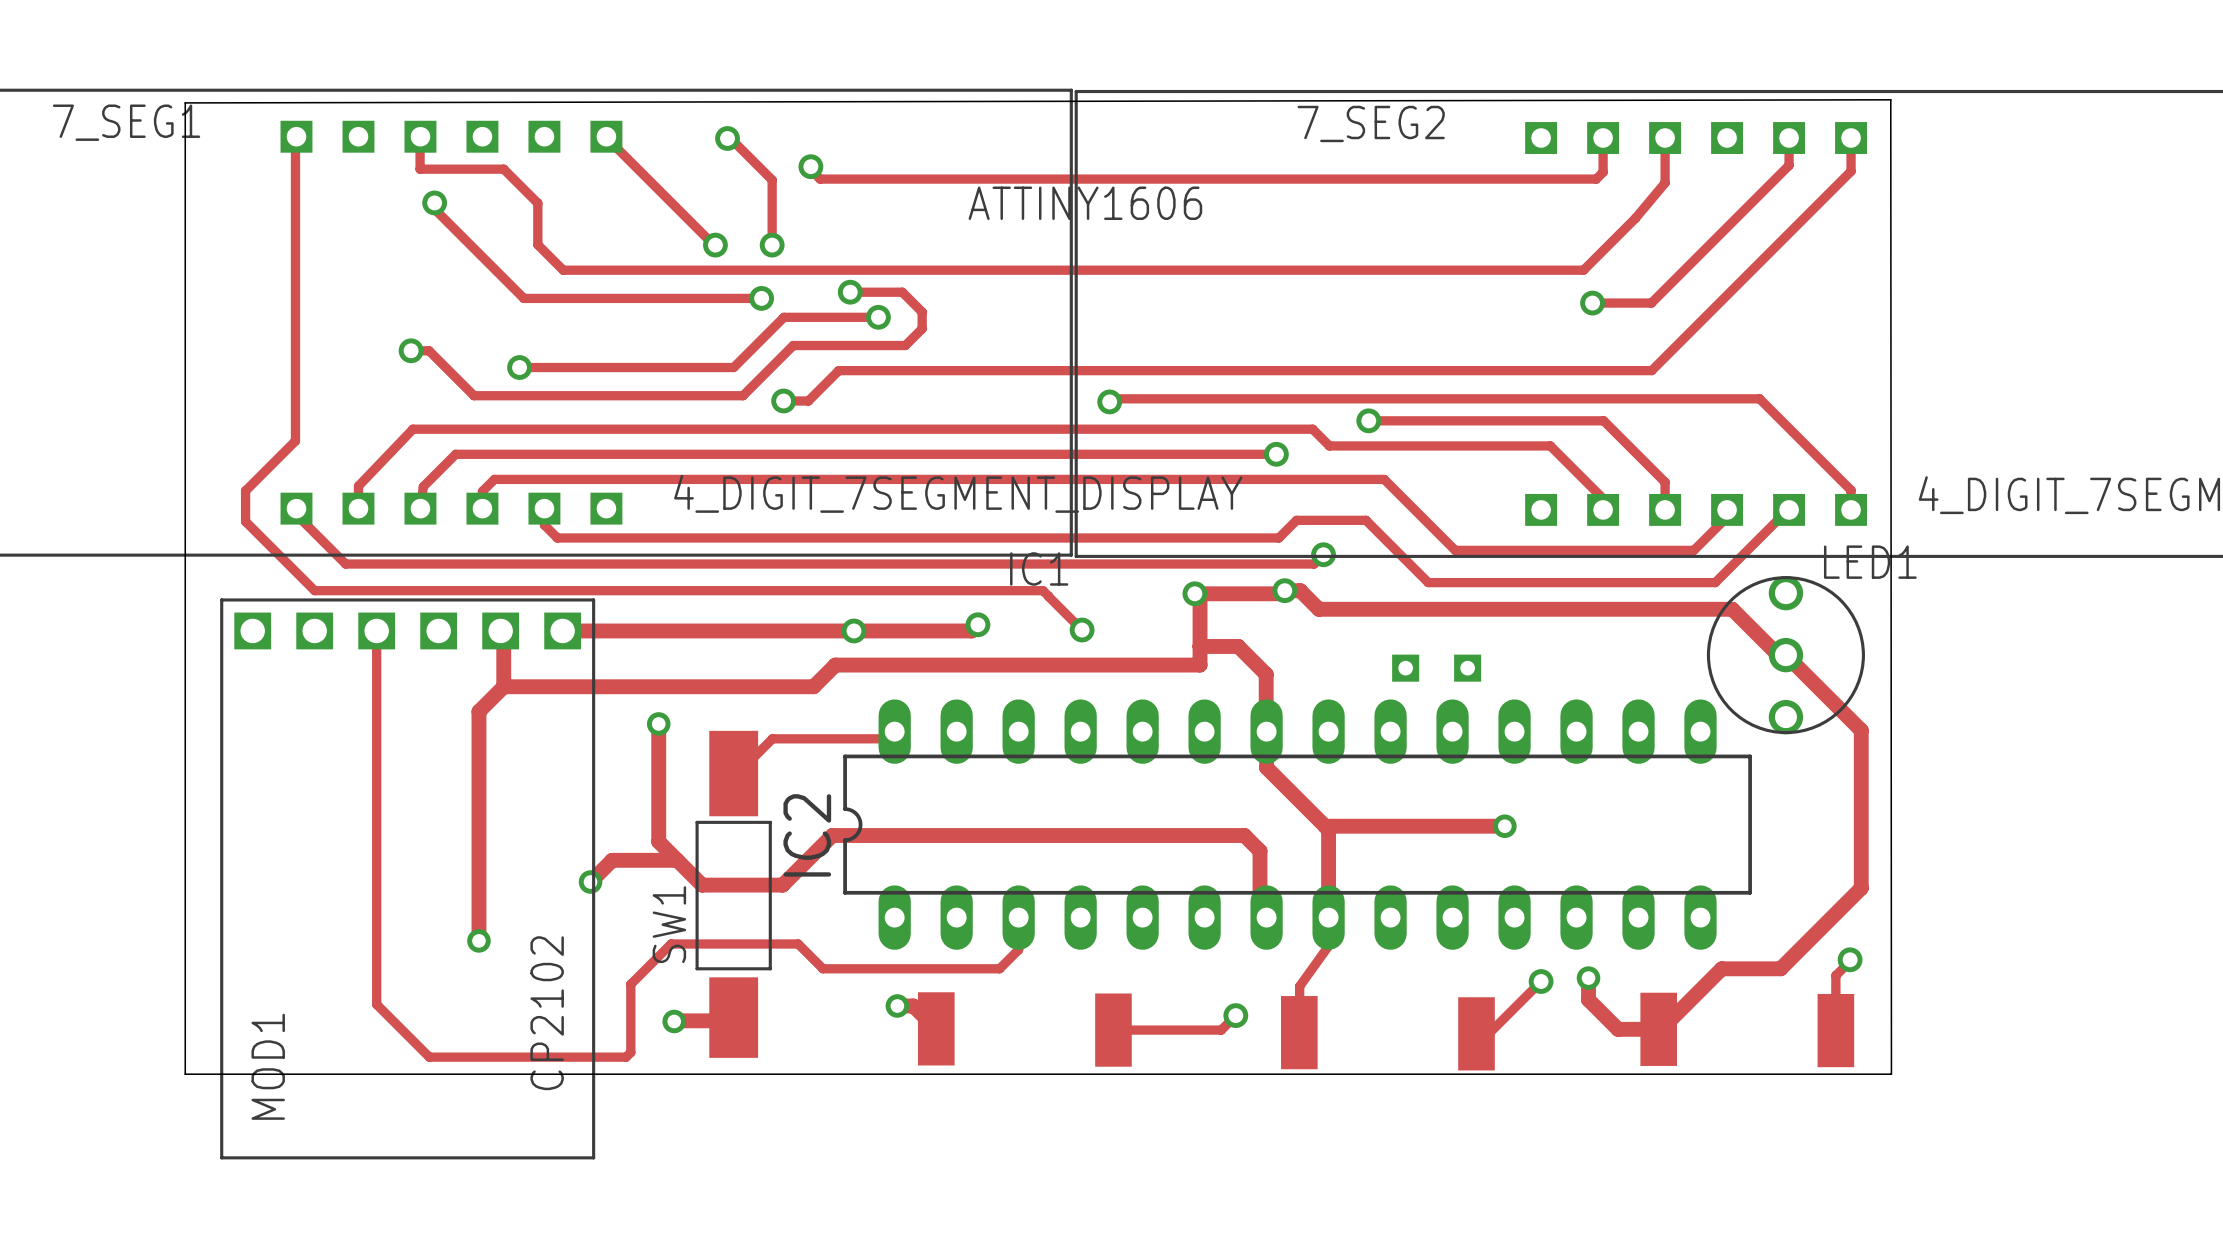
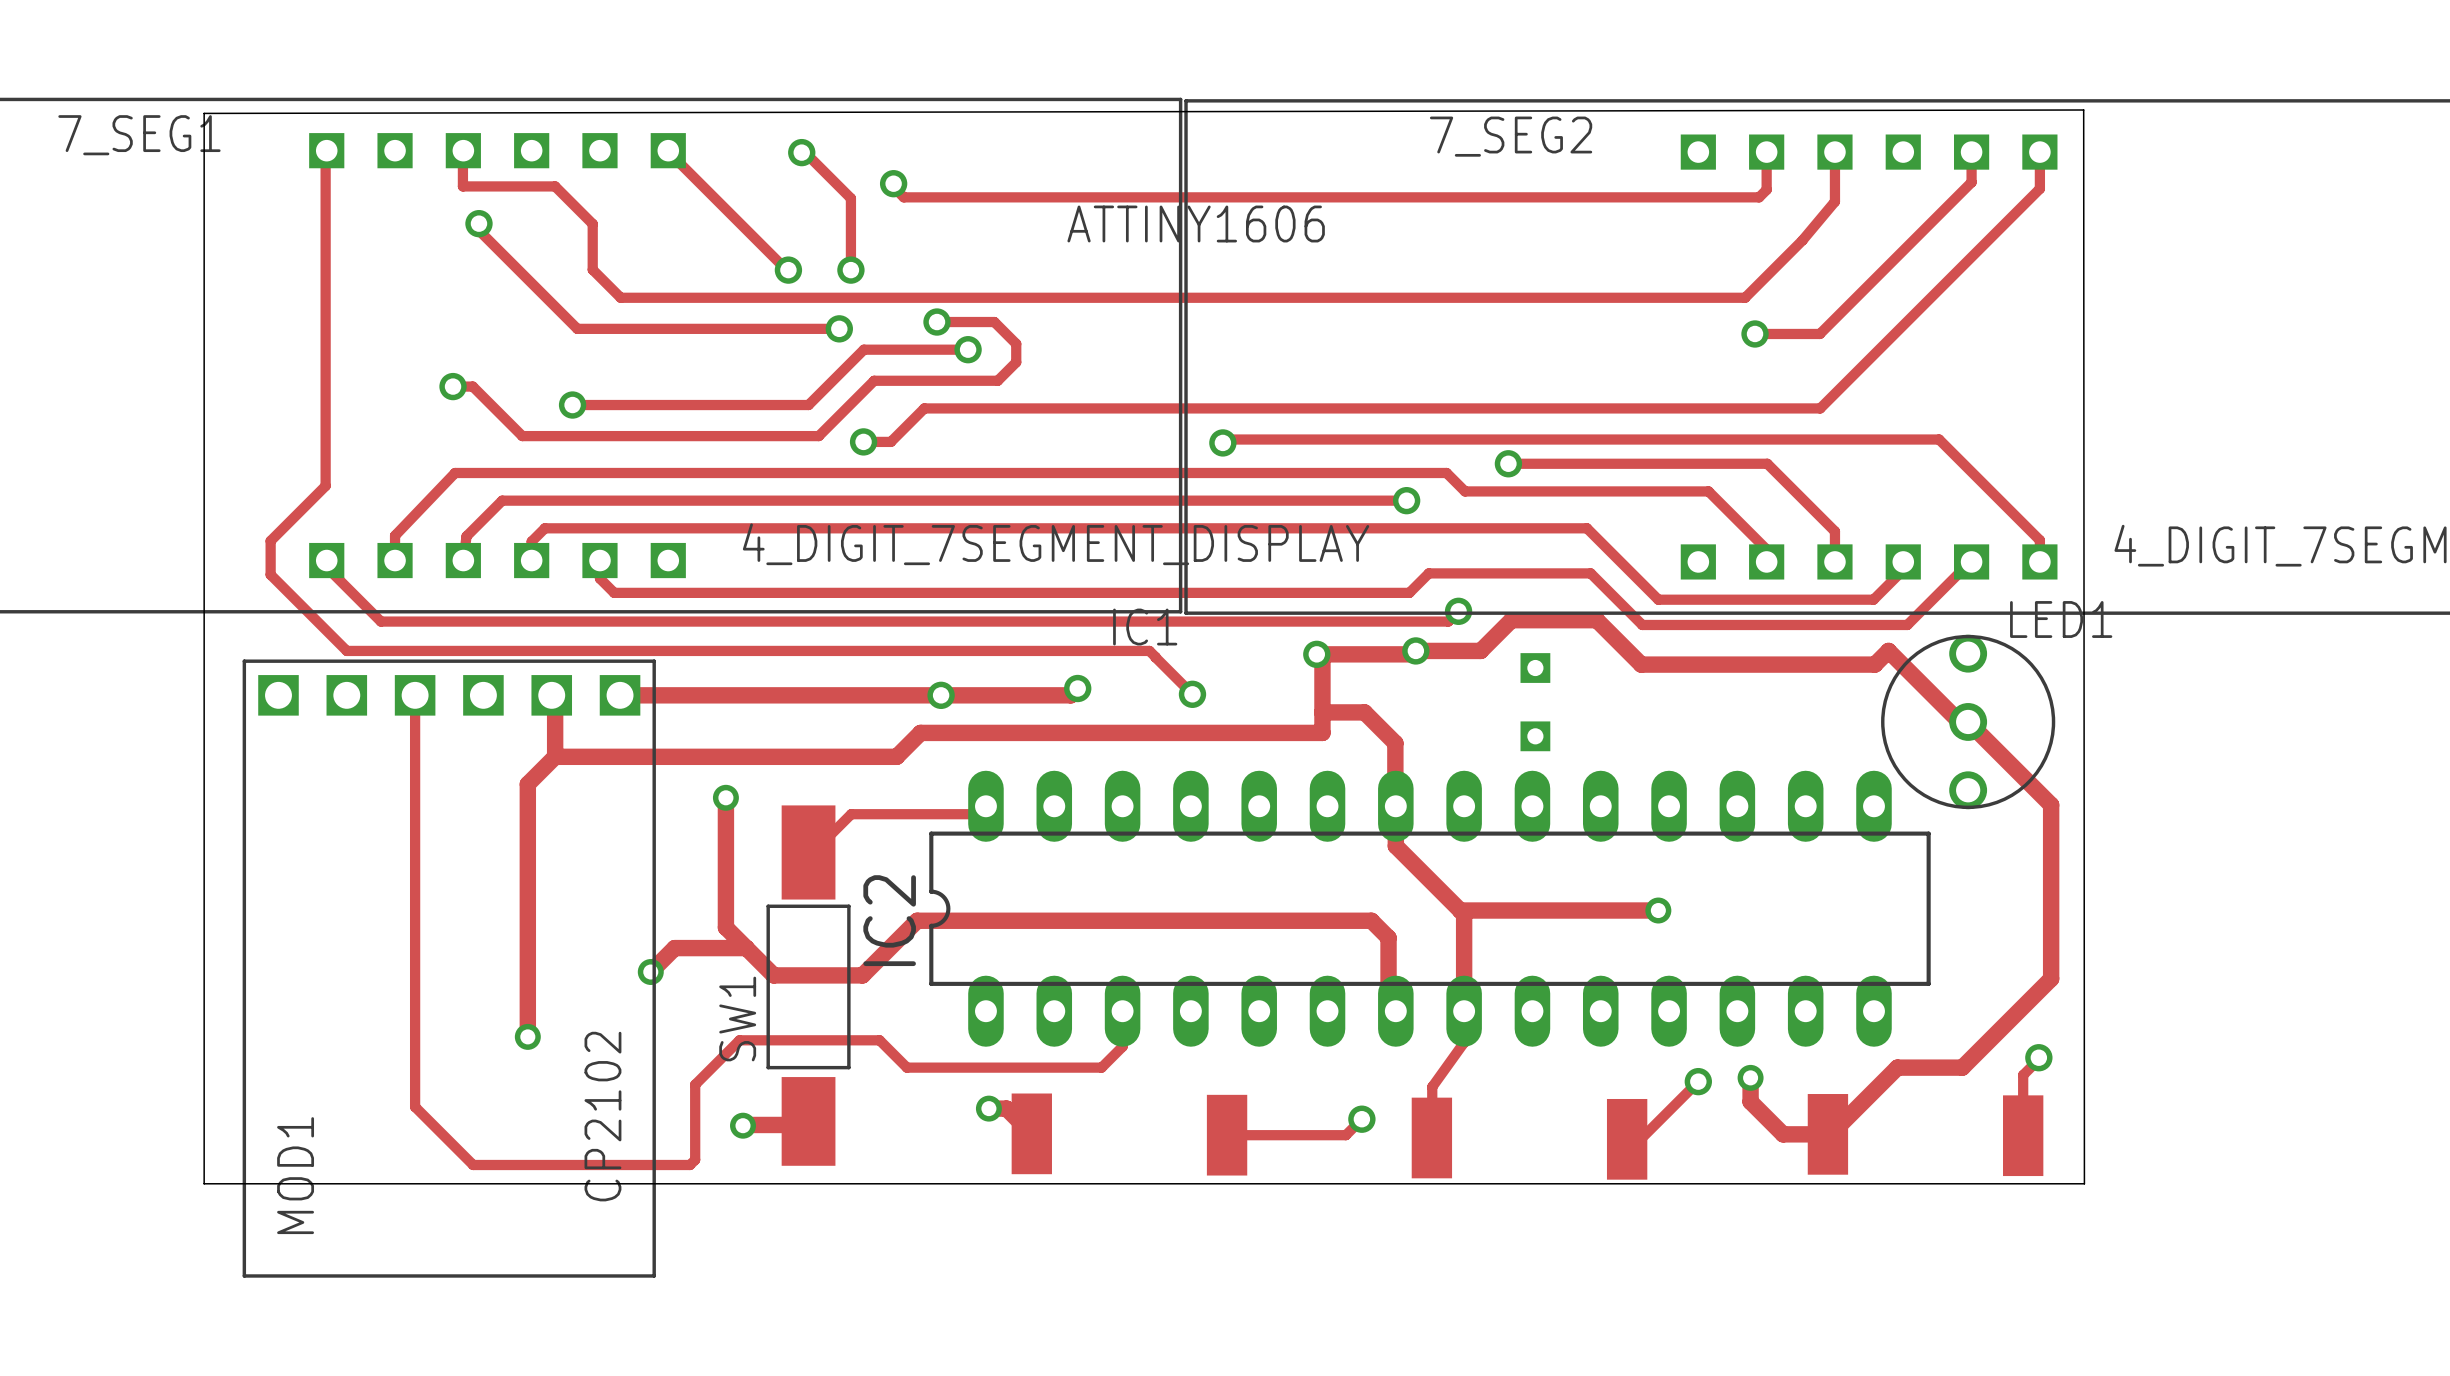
track: (1384, 479) (1455, 550) (1693, 550) (1700, 544) -> (1525, 528) (1586, 528) (1658, 599) (1873, 599)
track: (1365, 520) (1428, 582) (1715, 582) (1730, 567) -> (1505, 573) (1590, 573) (1642, 624) (1907, 624)
track: (1300, 590) (1318, 609) (1732, 609) -> (1432, 650) (1480, 650) (1511, 620) (1596, 620) (1641, 664) (1874, 664) (1888, 650) (1909, 671)
part rotation: 0° (1436, 668) -> 90° clockwise (1535, 702)

